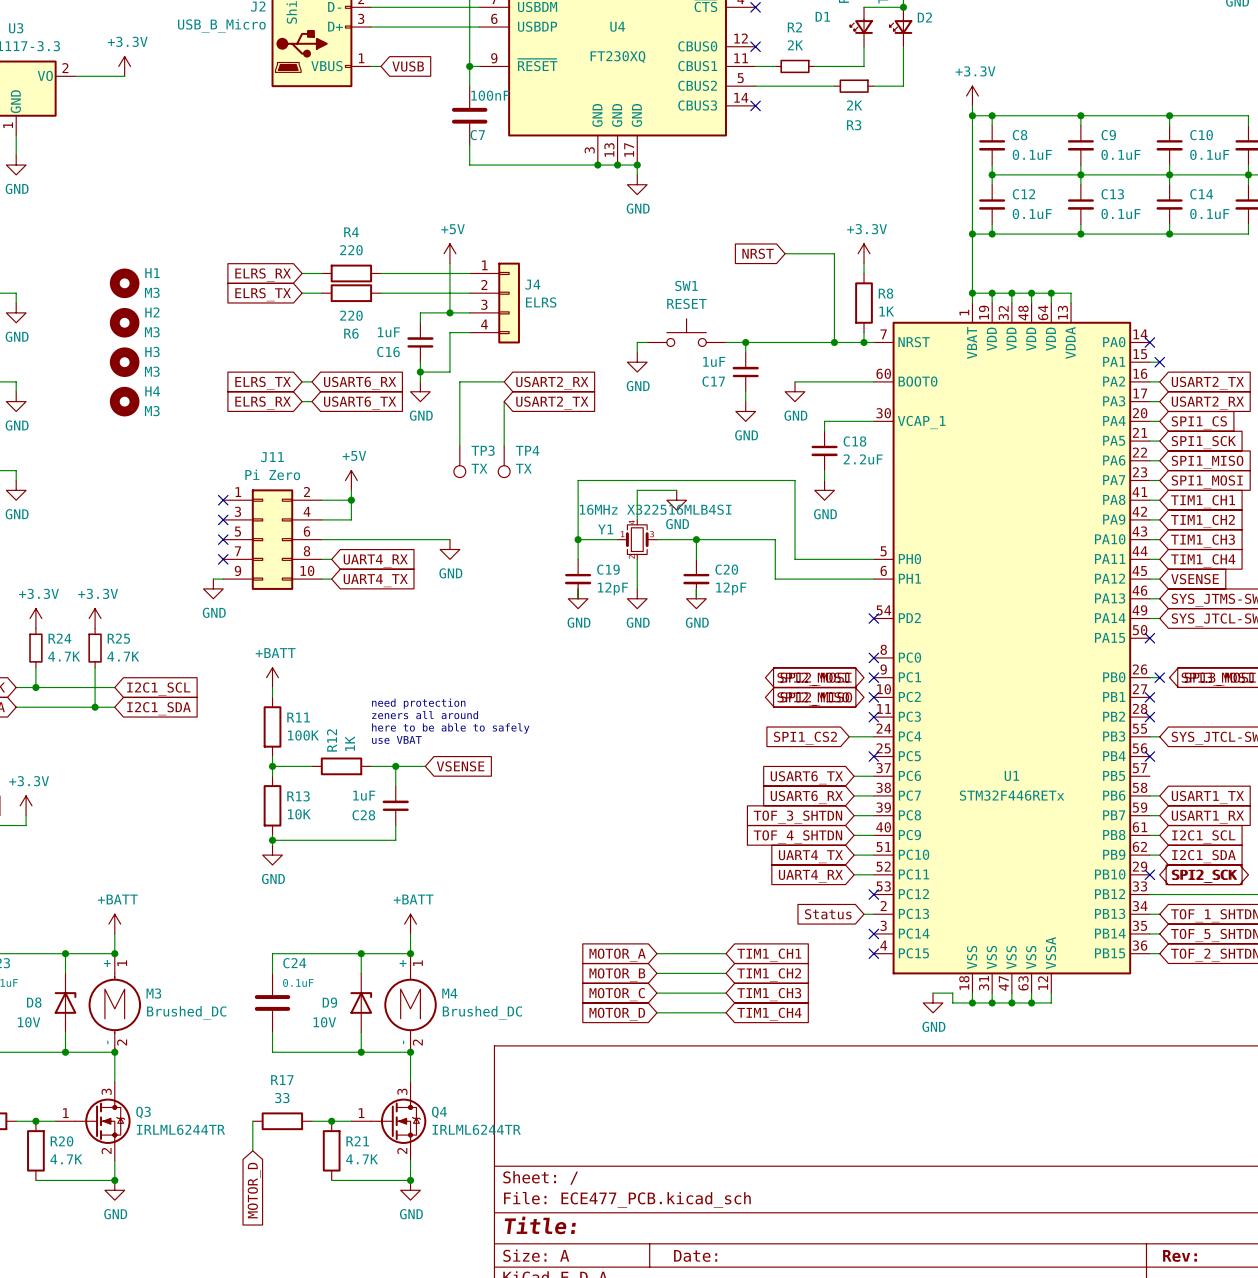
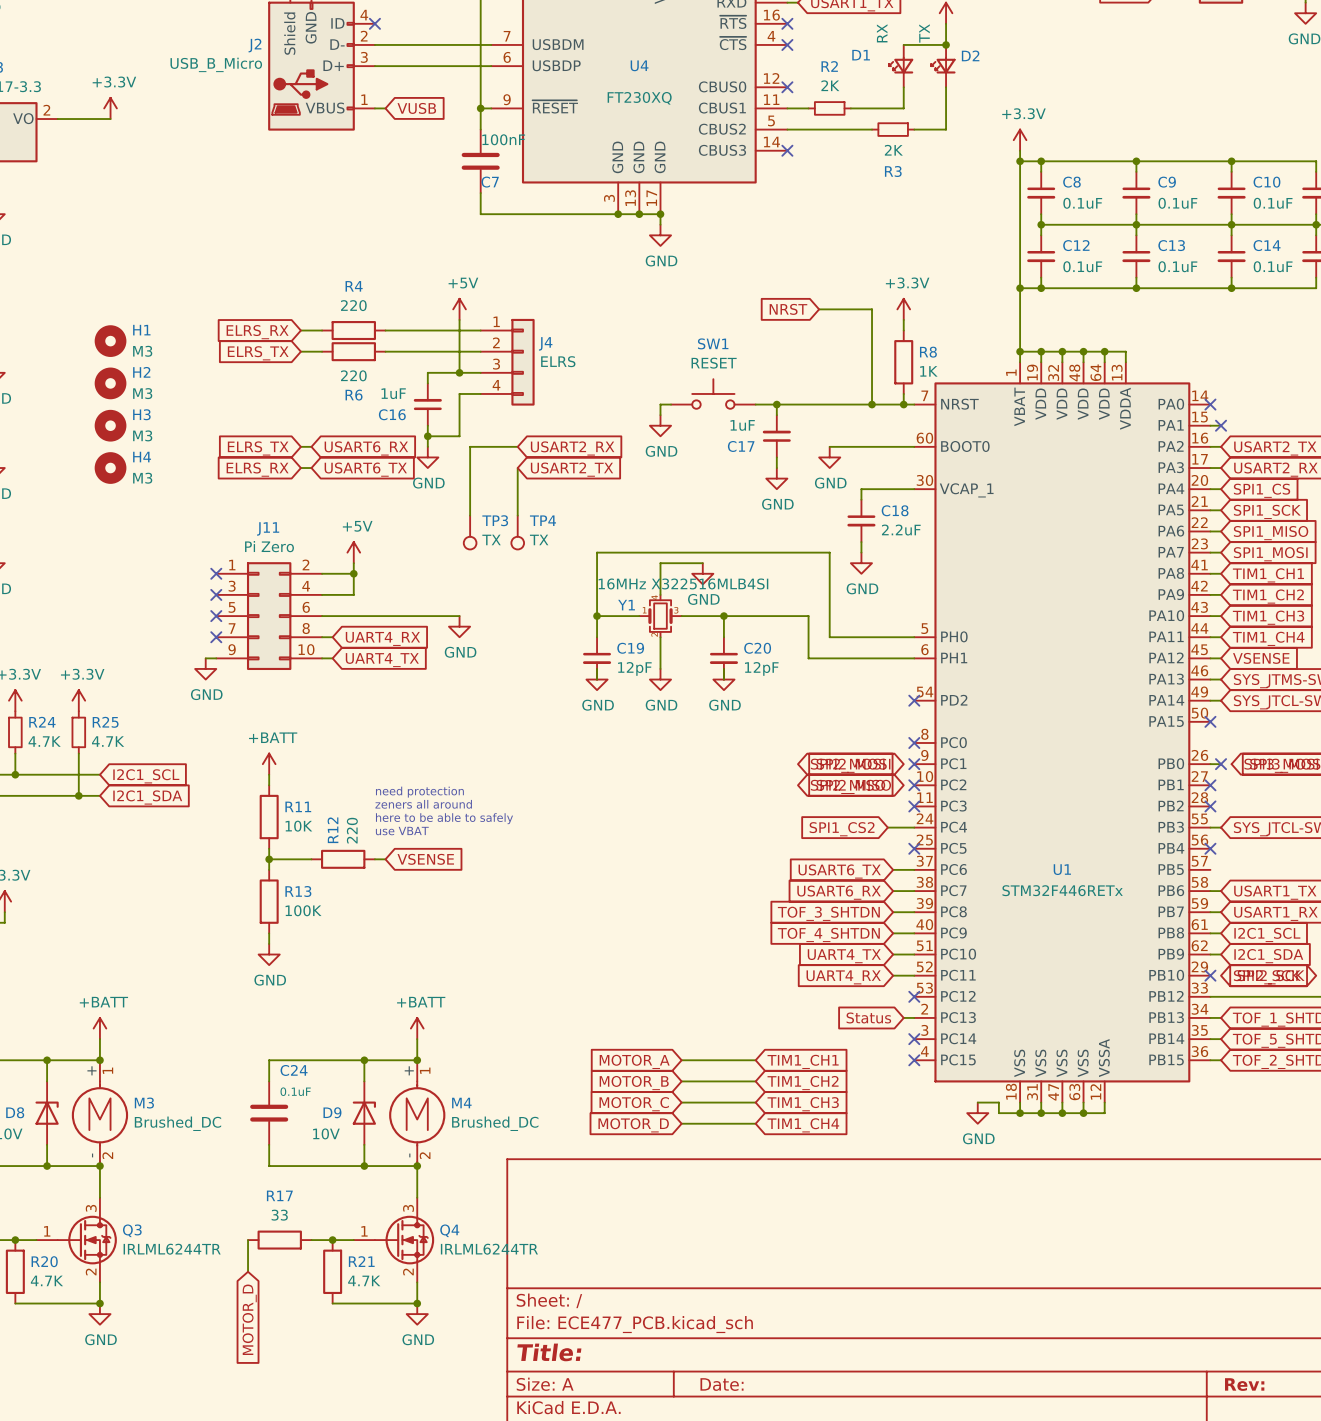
R11 value: 100K (303, 735) -> 10K (298, 826)
R12 value: 1K (350, 743) -> 220 (352, 830)
wire: (380, 766) (425, 766) -> none
wire: (395, 766) (395, 786) -> none
junction: (395, 766) -> none
global label position: VSENSE (460, 766) -> VSENSE (425, 859)
C28: 1uF (395, 805) -> none
R13 value: 10K (299, 814) -> 100K (303, 910)
wire: (395, 825) (395, 840) (272, 840) -> none
junction: (272, 840) -> none

